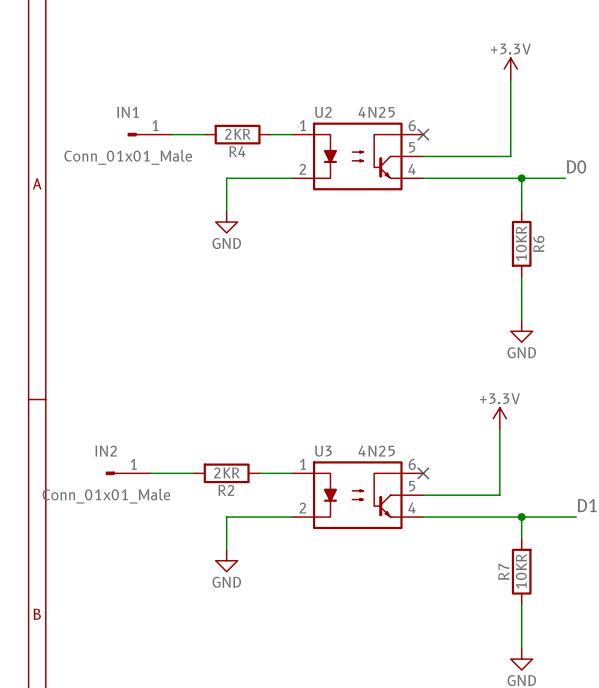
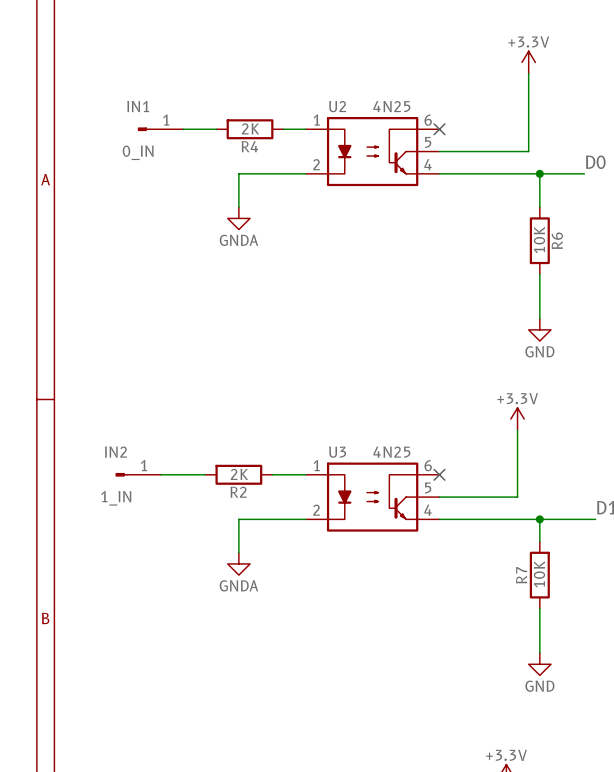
R4 value: 2KR (237, 134) -> 2K (250, 128)
IN1 value: Conn_01x01_Male (128, 157) -> 0_IN (138, 152)
power symbol: GND (226, 222) -> GNDA (238, 218)
R6 value: 10KR (521, 243) -> 10K (539, 240)
R2 value: 2KR (226, 472) -> 2K (239, 474)
IN2 value: Conn_01x01_Male (106, 496) -> 1_IN (116, 498)
power symbol: GND (226, 560) -> GNDA (238, 563)
R7 value: 10KR (521, 571) -> 10K (539, 574)

